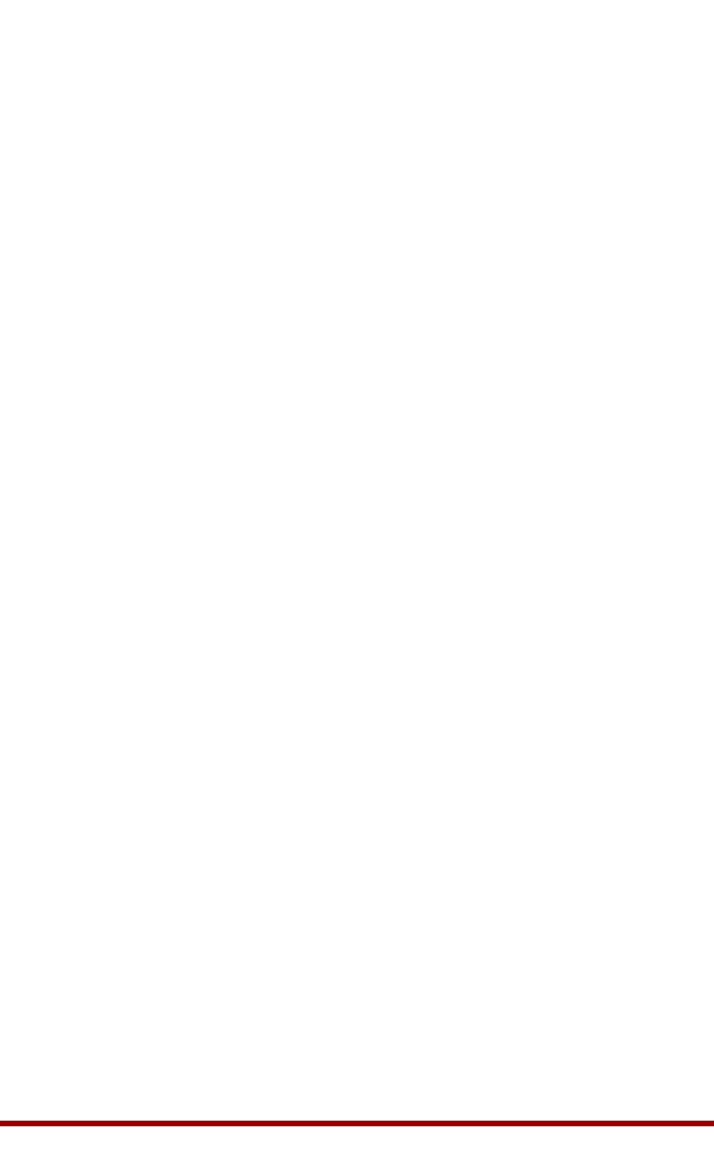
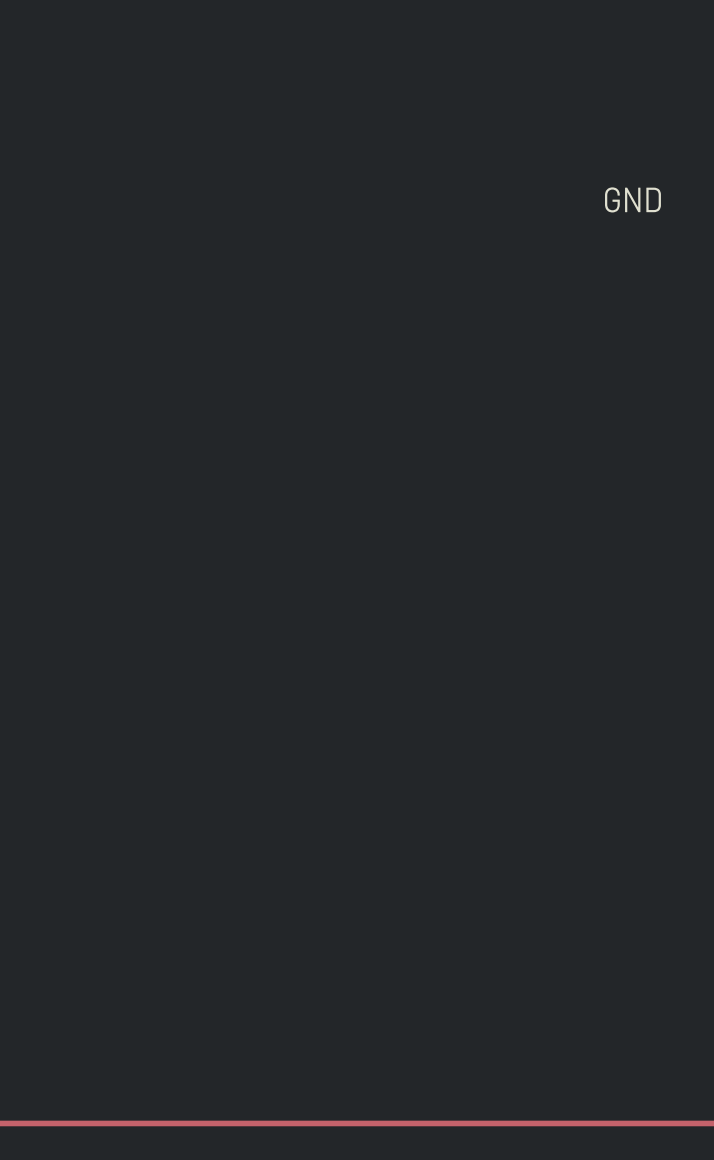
label: none -> GND (632, 199)

